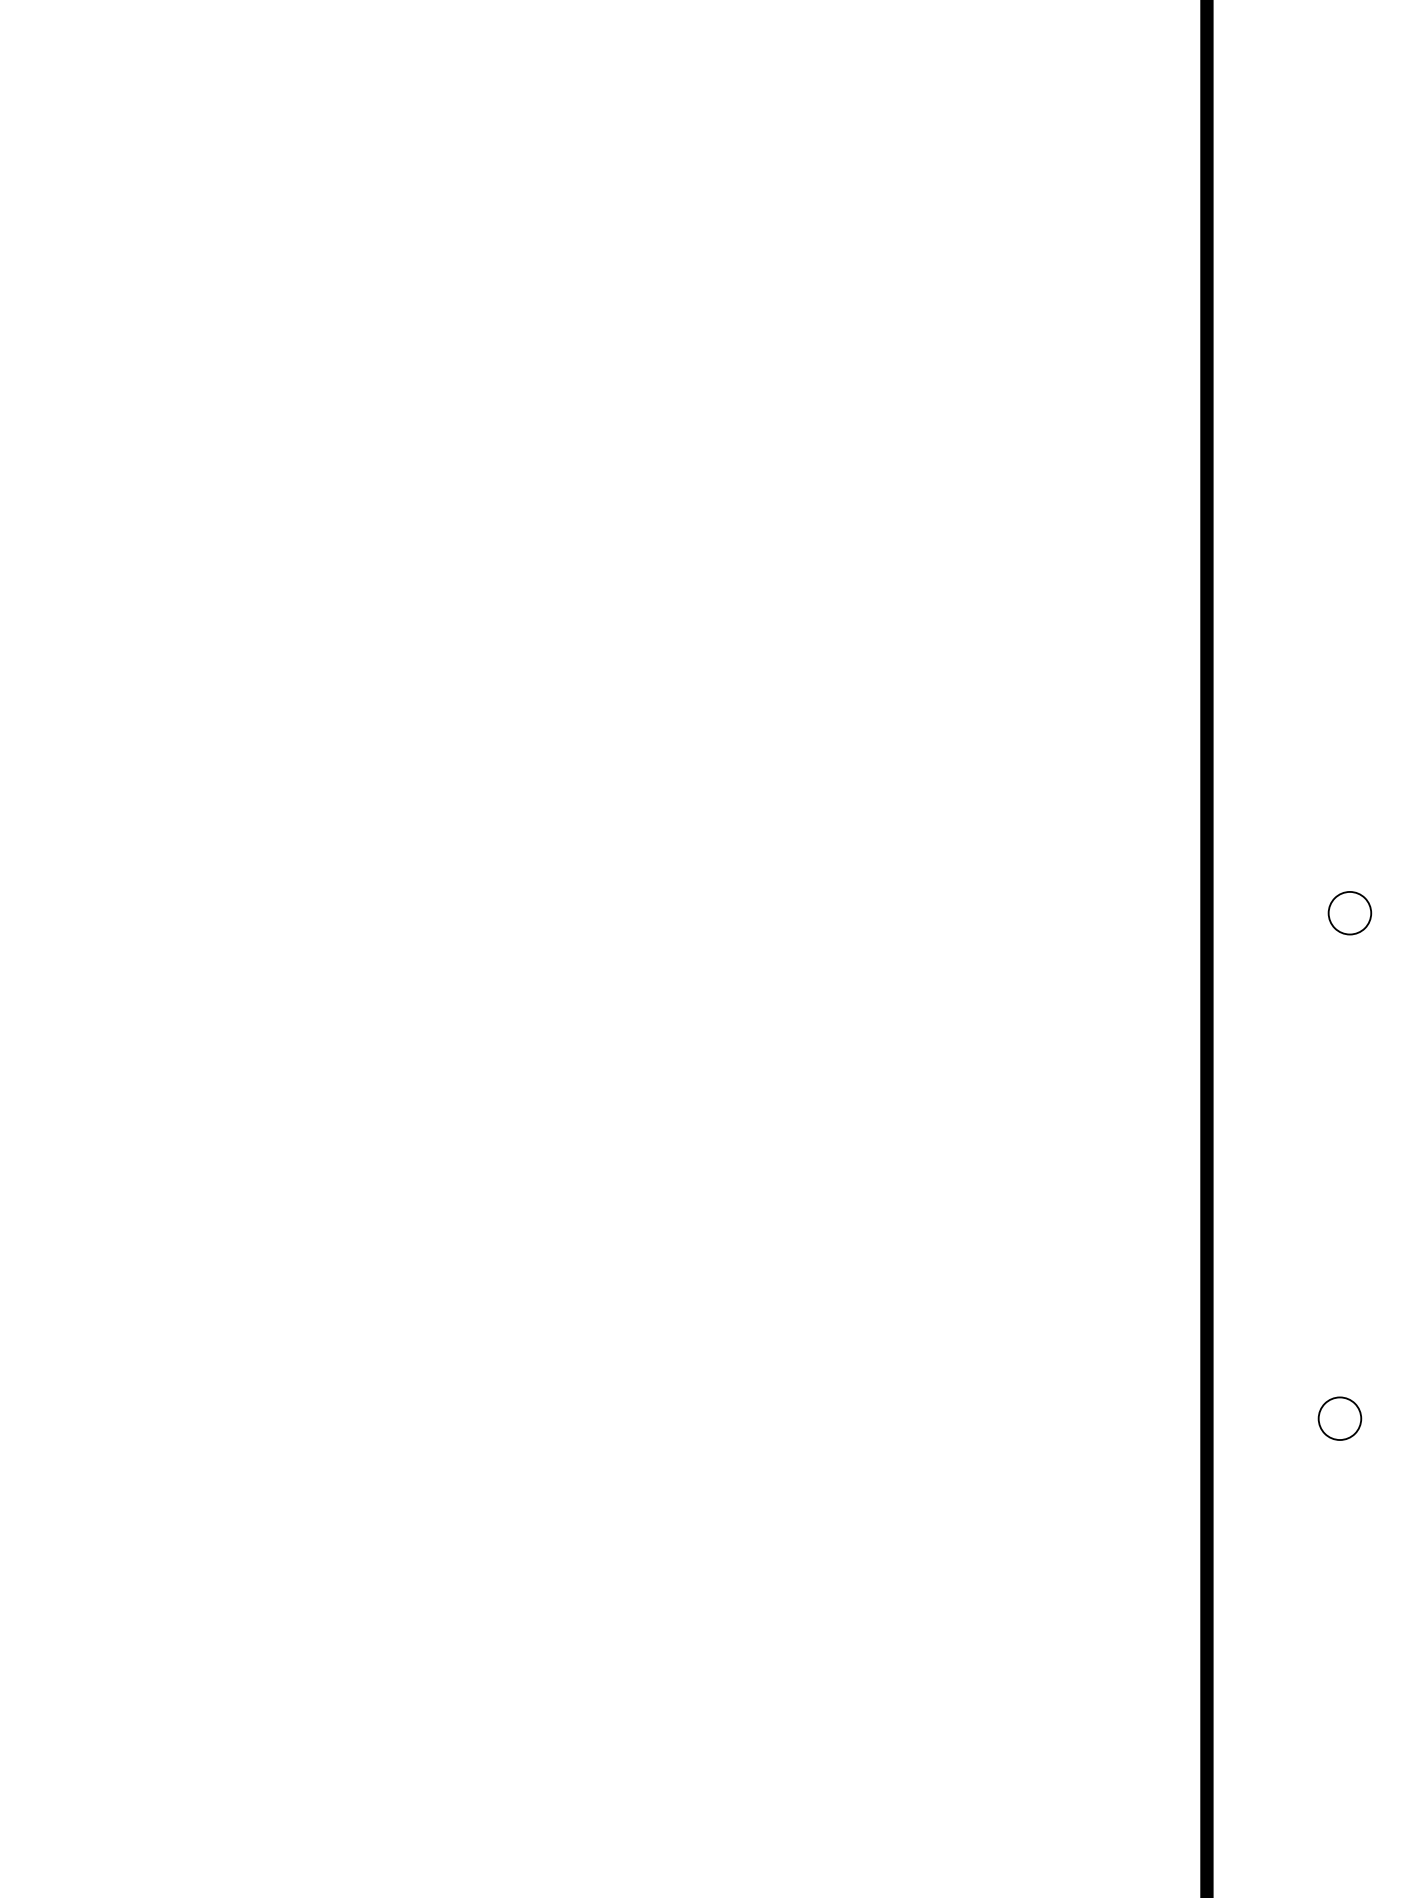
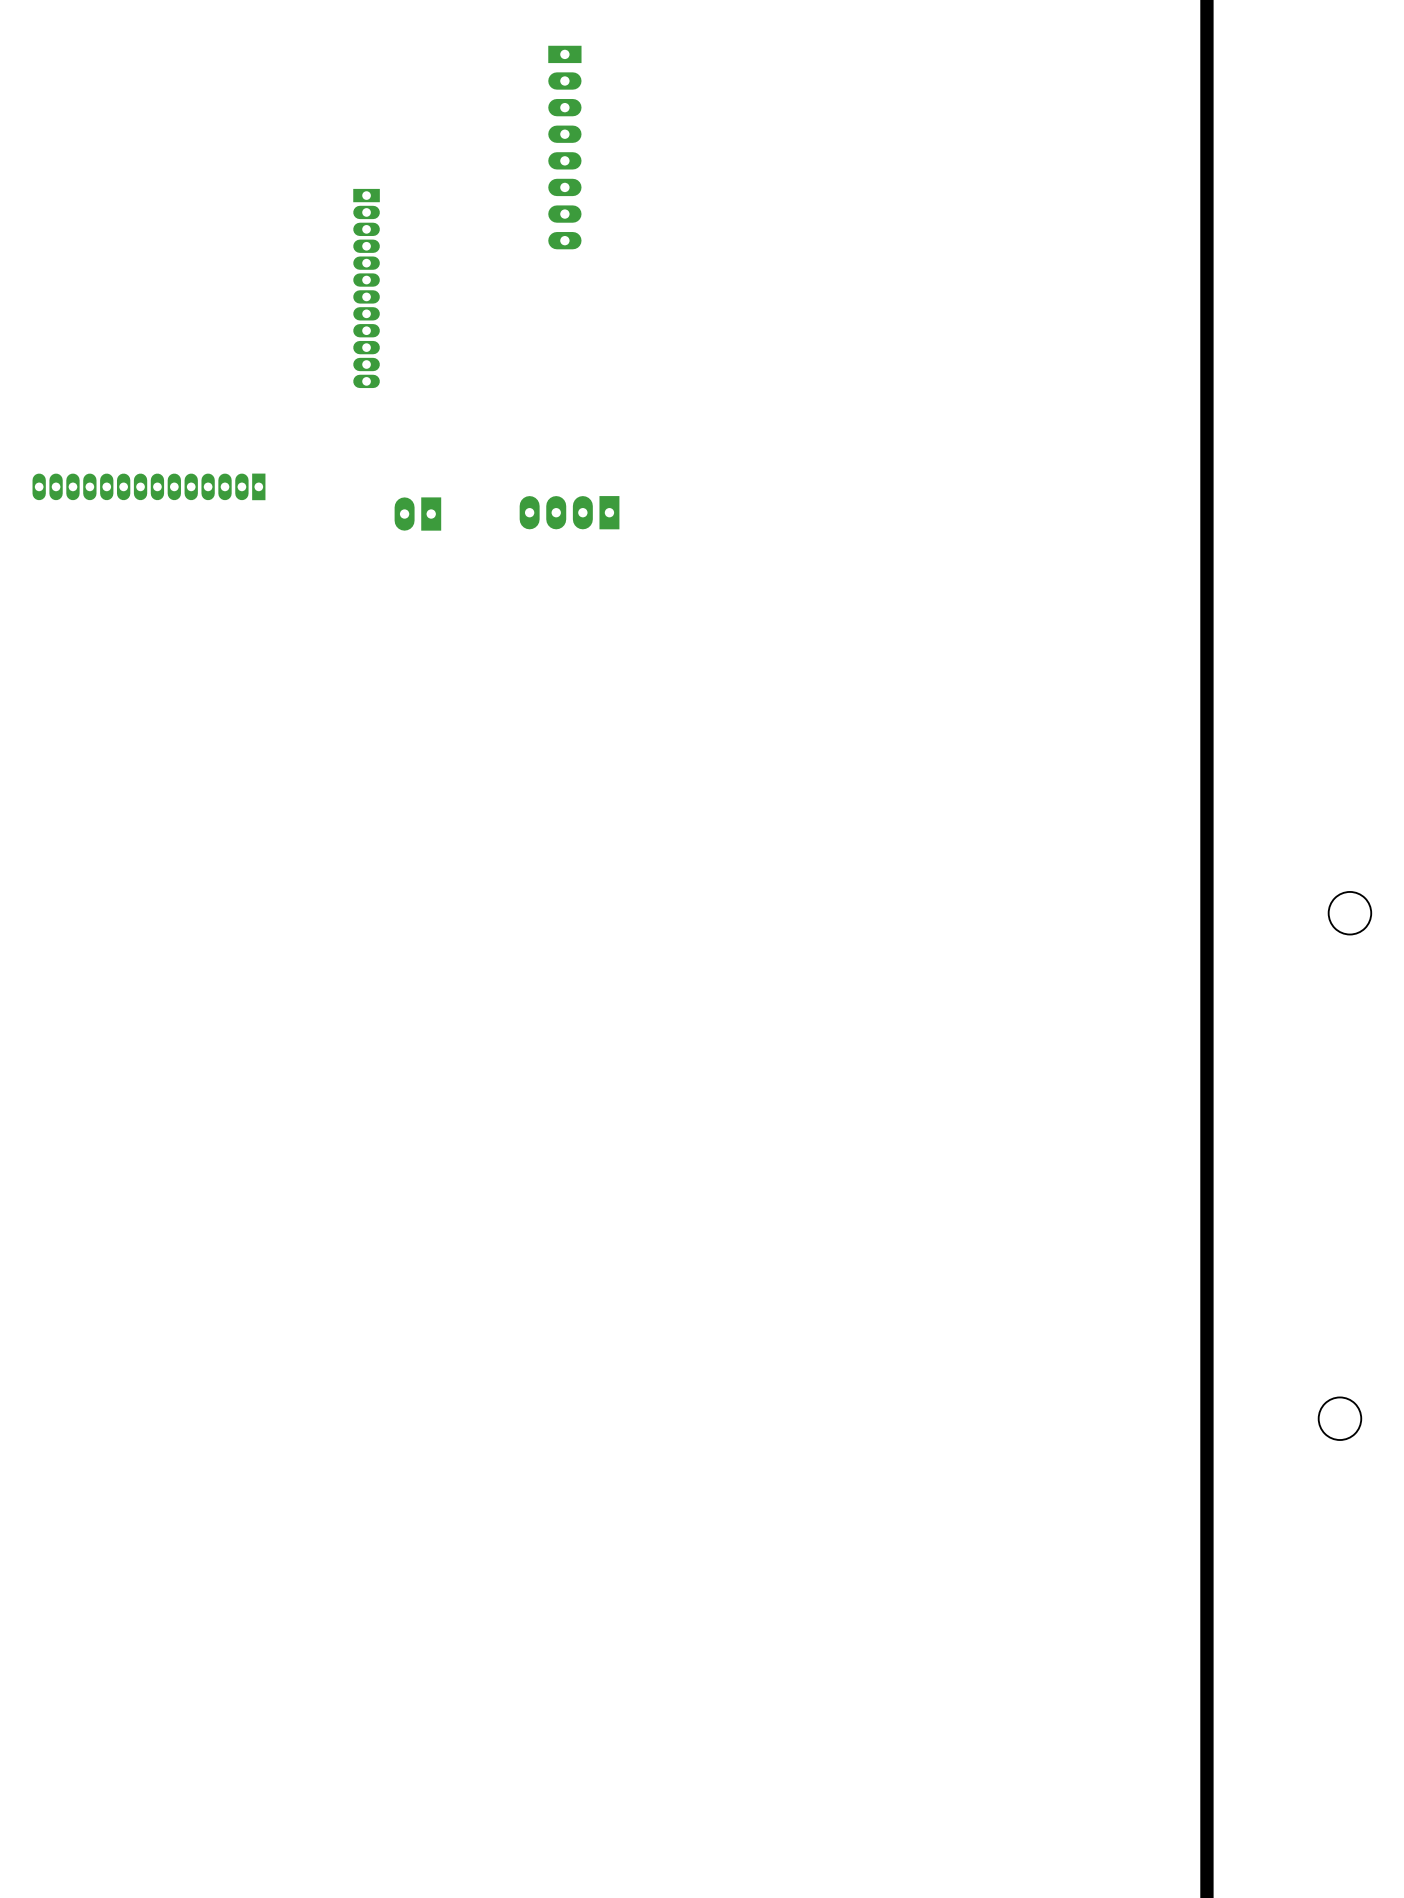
part: none -> (564, 147)
part: none -> (366, 288)
part: none -> (148, 486)
part: none -> (569, 512)
part: none -> (417, 514)

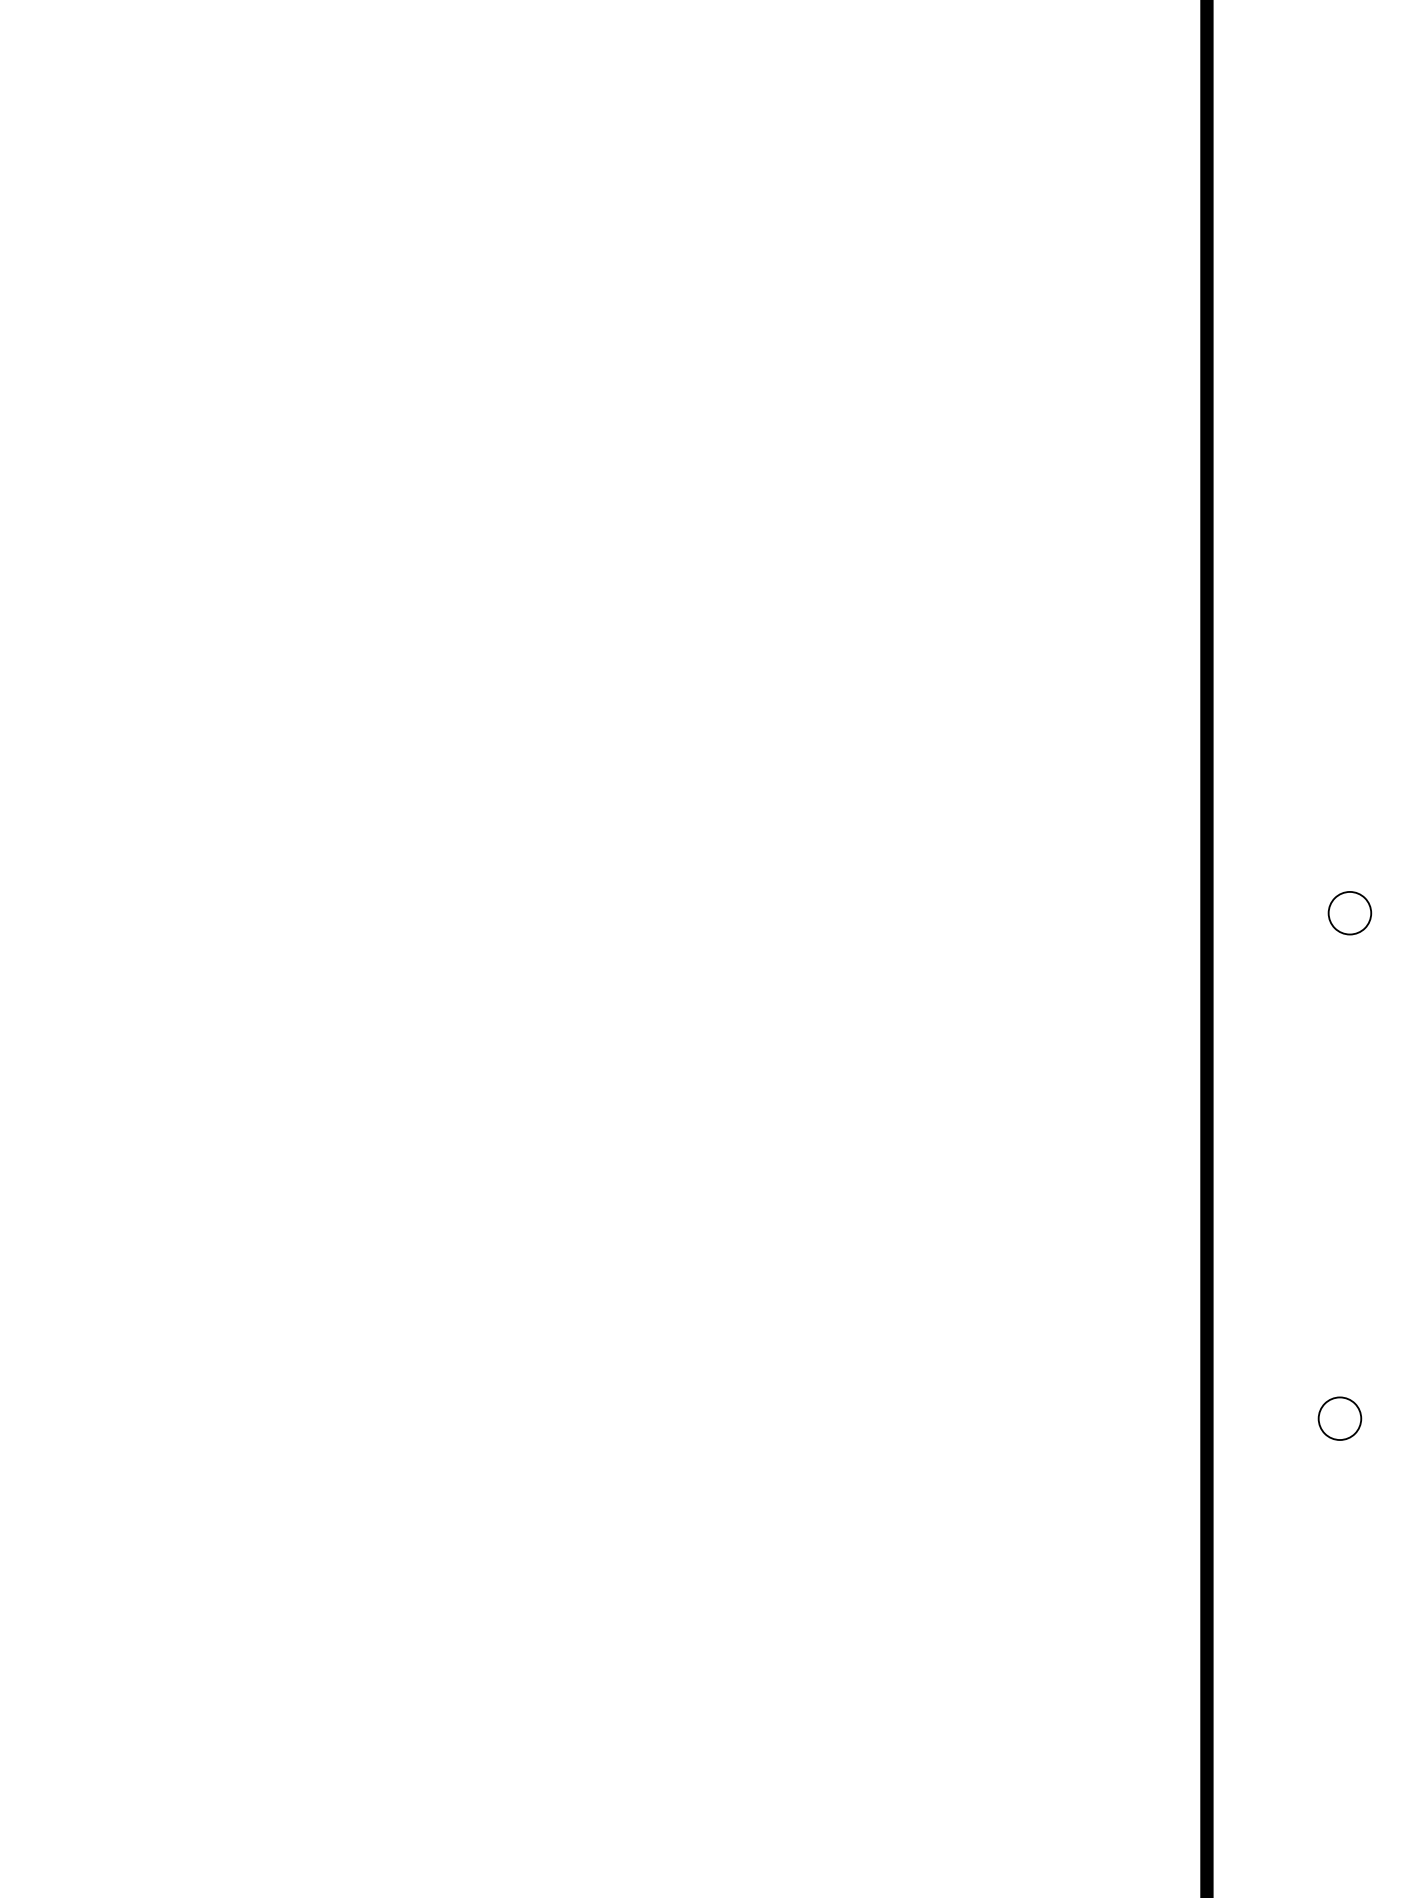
part: (564, 147) -> none
part: (366, 288) -> none
part: (148, 486) -> none
part: (569, 512) -> none
part: (417, 514) -> none

